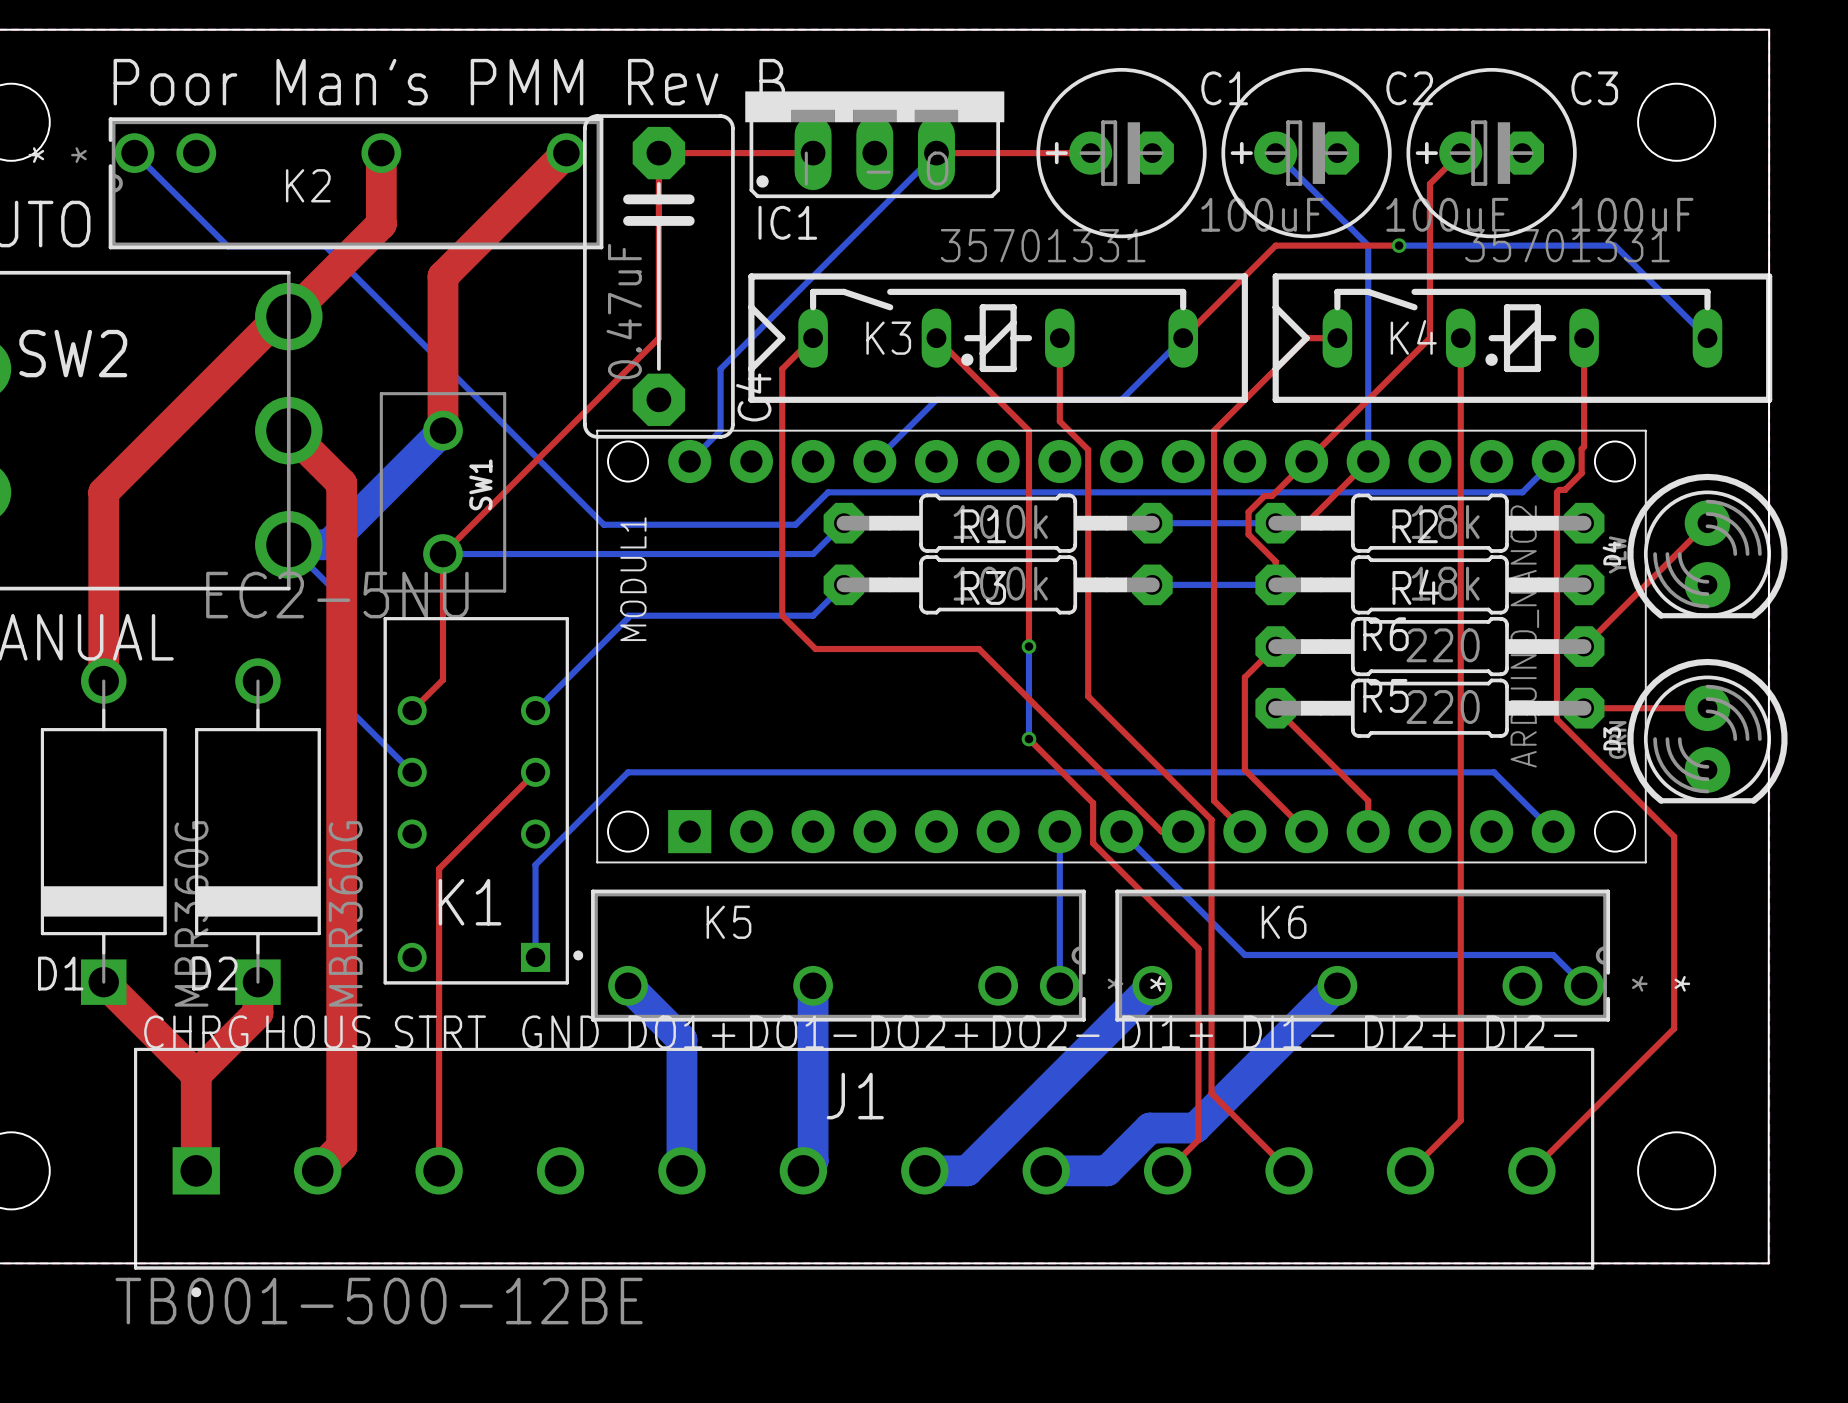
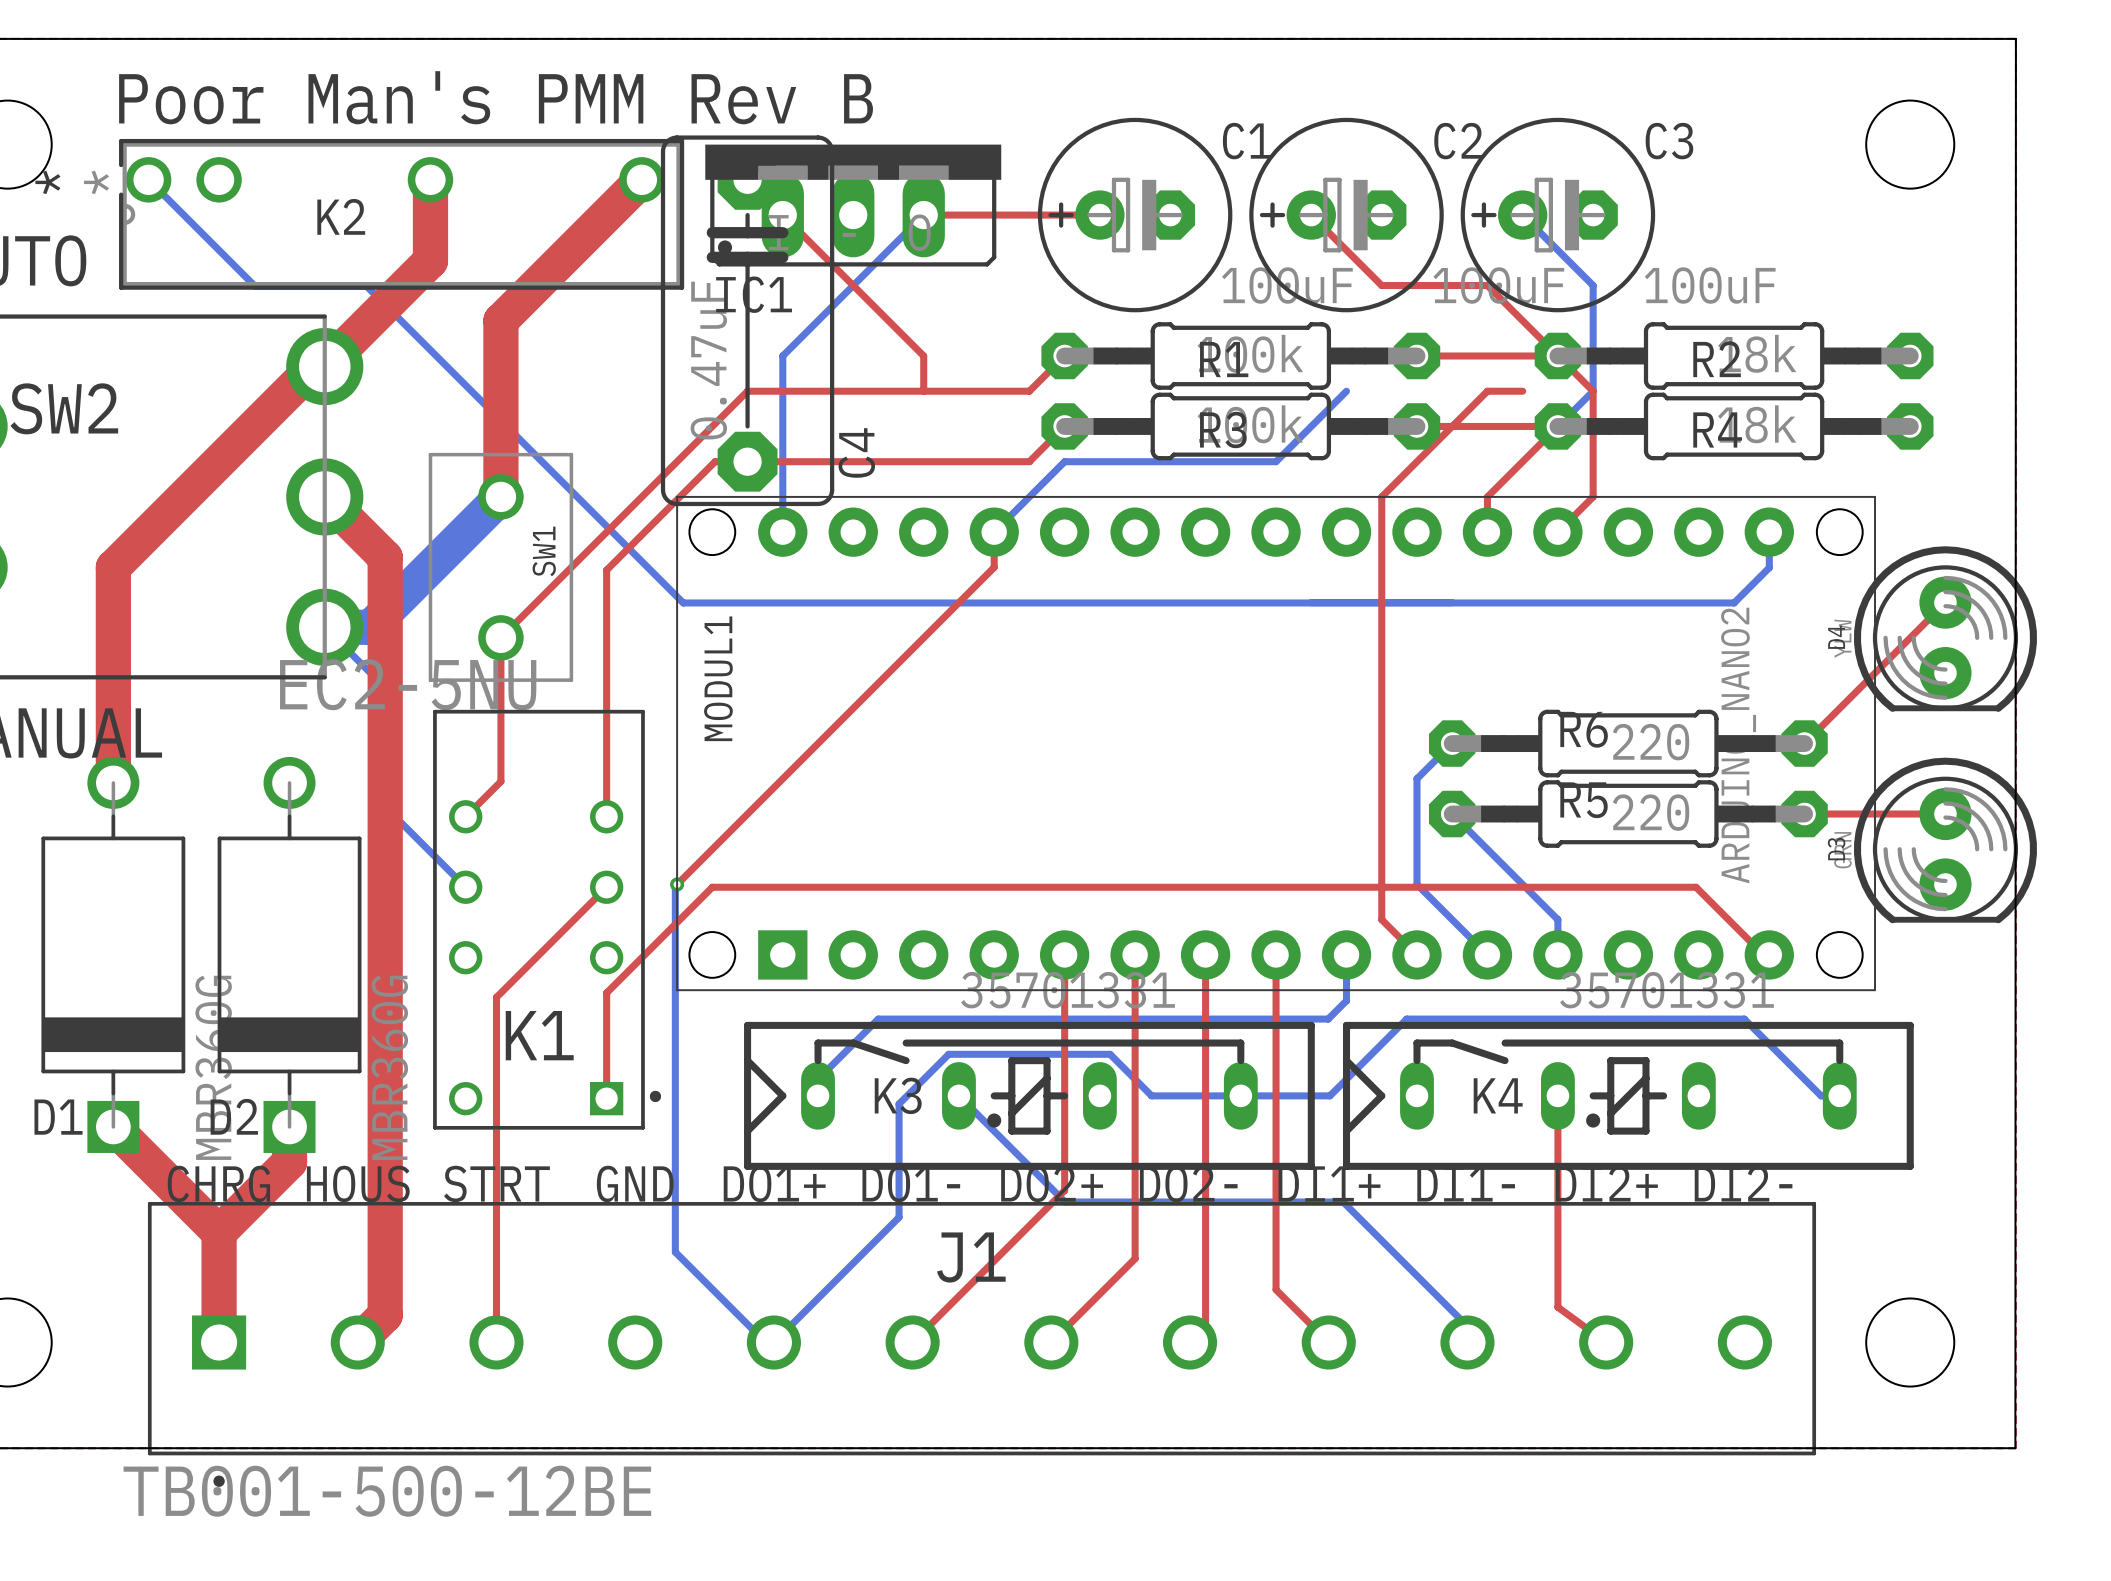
IC1 position: (874, 144) -> (853, 205)
top track: (813, 153) (658, 153) (658, 338) -> (1064, 355) (1029, 391) (747, 391)
top track: (936, 153) (1090, 153) -> (923, 215) (1099, 215)
bottom track: (936, 153) (720, 368) (720, 430) (689, 461) -> (923, 215) (782, 355) (782, 532)
C1 position: (1121, 153) -> (1135, 215)
bottom track: (1275, 153) (1368, 245) (1368, 461) -> none
C2 position: (1306, 153) -> (1346, 215)
top track: (1460, 153) (1429, 183) (1429, 338) (1272, 496) (1264, 496) (1248, 511) (1248, 534) (1275, 561) (1275, 584) -> none
C3 position: (1491, 153) -> (1557, 215)
bottom track: none -> (1522, 215) (1593, 285) (1593, 391) (1557, 426)
top track: (1275, 245) (1183, 338) -> (1452, 285) (1381, 285) (1311, 215)
top track: (1306, 245) (1399, 245) -> (1487, 285) (1593, 391) (1593, 496) (1557, 532)
bottom track: (1399, 245) (1614, 245) (1707, 338) -> none
via: (1399, 245) -> none
top track: none -> (1416, 355) (1557, 355)
top track: (813, 338) (782, 368) (782, 615) (815, 649) (979, 649) (1161, 831) (1183, 831) -> (923, 391) (923, 355) (782, 215)
top track: (936, 338) (1028, 430) (1028, 646) -> none
K3 position: (998, 338) -> (1029, 1095)
top track: (1059, 338) (1059, 421) (1088, 449) (1088, 696) (1211, 819) (1211, 1093) (1289, 1170) -> none
top track: (1460, 338) (1460, 1120) (1410, 1170) -> (1557, 1095) (1557, 1307) (1606, 1342)
K4 position: (1522, 338) -> (1628, 1095)
top track: (1584, 338) (1584, 446) (1581, 449) (1581, 473) (1565, 489) (1559, 489) (1556, 492) (1556, 719) (1674, 836) (1674, 1028) (1531, 1170) -> none
top track: none -> (1064, 426) (1029, 461) (715, 461) (606, 570) (606, 816)
top track: none -> (1416, 426) (1557, 426) (1487, 496) (1487, 532)
top track: none -> (994, 532) (994, 567) (677, 884)
top track: (1368, 461) (1306, 523) (1275, 523) -> none
bottom track: (1553, 461) (1522, 492) (828, 492) (795, 524) (602, 523) -> (1769, 532) (1769, 567) (1734, 602) (683, 602)
bottom track: (843, 523) (813, 554) (443, 554) -> none
R1 position: (998, 523) -> (1240, 355)
R2 position: (1429, 523) -> (1734, 355)
bottom track: (843, 584) (813, 615) (628, 615) (628, 618) (535, 710) -> none
R3 position: (998, 584) -> (1240, 426)
bottom track: (1152, 584) (1275, 584) -> none
R4 position: (1429, 584) -> (1734, 426)
bottom track: (1028, 646) (1028, 739) -> none
via: (1028, 646) -> none
top track: (1275, 646) (1244, 677) (1244, 769) (1306, 831) -> none
bottom track: none -> (1452, 743) (1416, 778) (1416, 884) (1487, 954)
top track: (1275, 708) (1368, 800) (1368, 831) -> none
bottom track: none -> (1452, 814) (1557, 919) (1557, 954)
top track: (1028, 739) (1093, 803) (1093, 843) (1198, 948) (1198, 1140) (1167, 1170) -> (1276, 954) (1276, 1289) (1328, 1342)
via: (1028, 739) -> none
bottom track: none -> (677, 884) (675, 886) (675, 1252) (765, 1342) (773, 1342) (899, 1217) (899, 1103) (948, 1054) (1110, 1054) (1151, 1095) (1329, 1095) (1406, 1019) (1744, 1019) (1821, 1095) (1839, 1095)
via: none -> (677, 884)
top track: none -> (1064, 954) (1064, 1190) (912, 1342)
top track: none -> (1135, 954) (1135, 1258) (1051, 1342)
top track: none -> (1205, 954) (1205, 1342) (1190, 1342)
bottom track: (1059, 831) (1059, 985) -> none
bottom track: (1121, 831) (1244, 954) (1553, 954) (1584, 985) -> none
bottom track: none -> (1346, 954) (1346, 1000) (1328, 1019) (878, 1019) (818, 1079) (818, 1095)
top track: none -> (1769, 954) (1763, 954) (1696, 887) (712, 887) (606, 992) (606, 1098)
bottom track: (1553, 831) (1494, 772) (628, 772) (535, 864) (535, 957) -> none
bottom track: none -> (958, 1095) (1065, 1202) (1343, 1202) (1467, 1326) (1467, 1342)
K5: (838, 955) -> none
K6: (1362, 955) -> none
bottom track: (628, 985) (681, 1039) (681, 1170) -> none
bottom track: (813, 985) (813, 1161) (803, 1170) -> none
bottom track: (1152, 985) (967, 1170) (924, 1170) -> none
bottom track: (1337, 985) (1195, 1128) (1149, 1128) (1107, 1170) (1046, 1170) -> none

